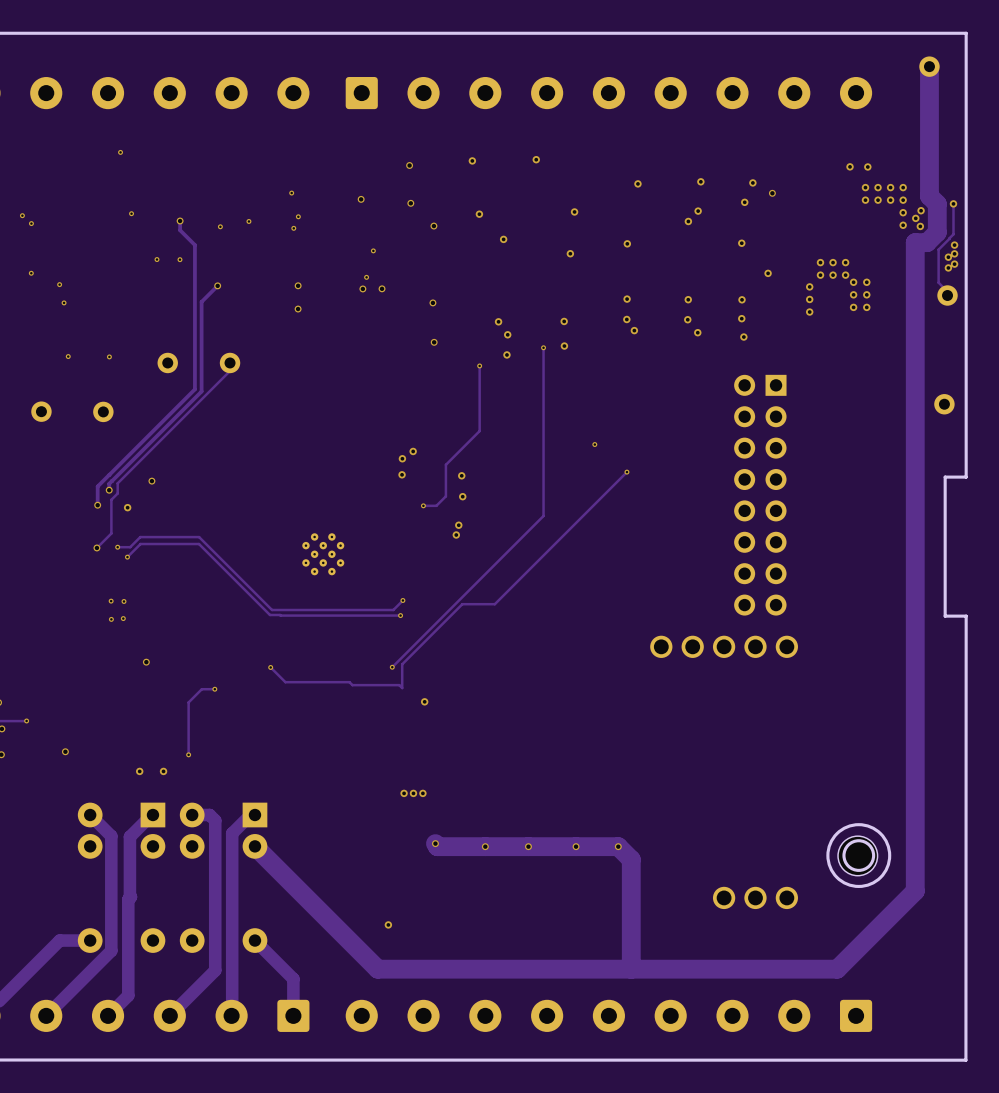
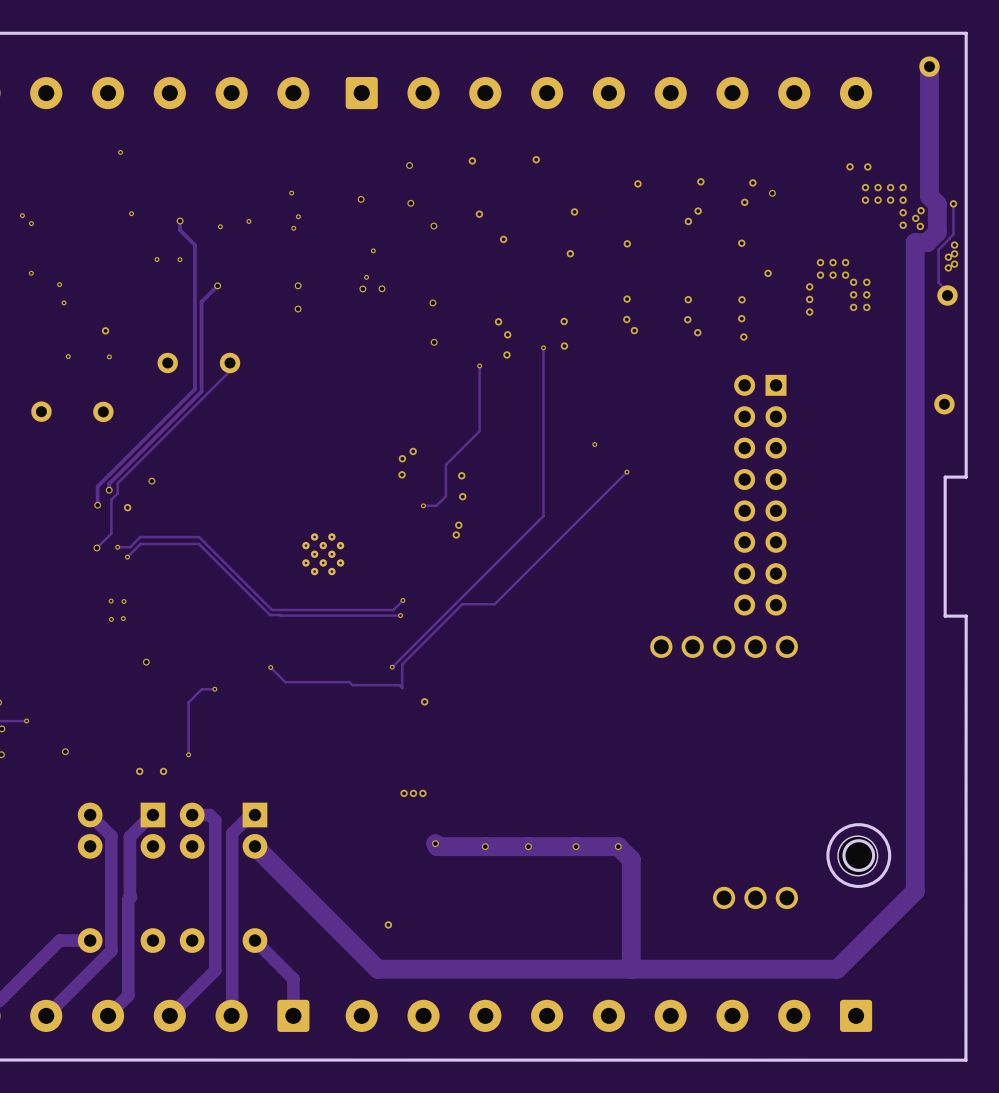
via: none -> (105, 330)

